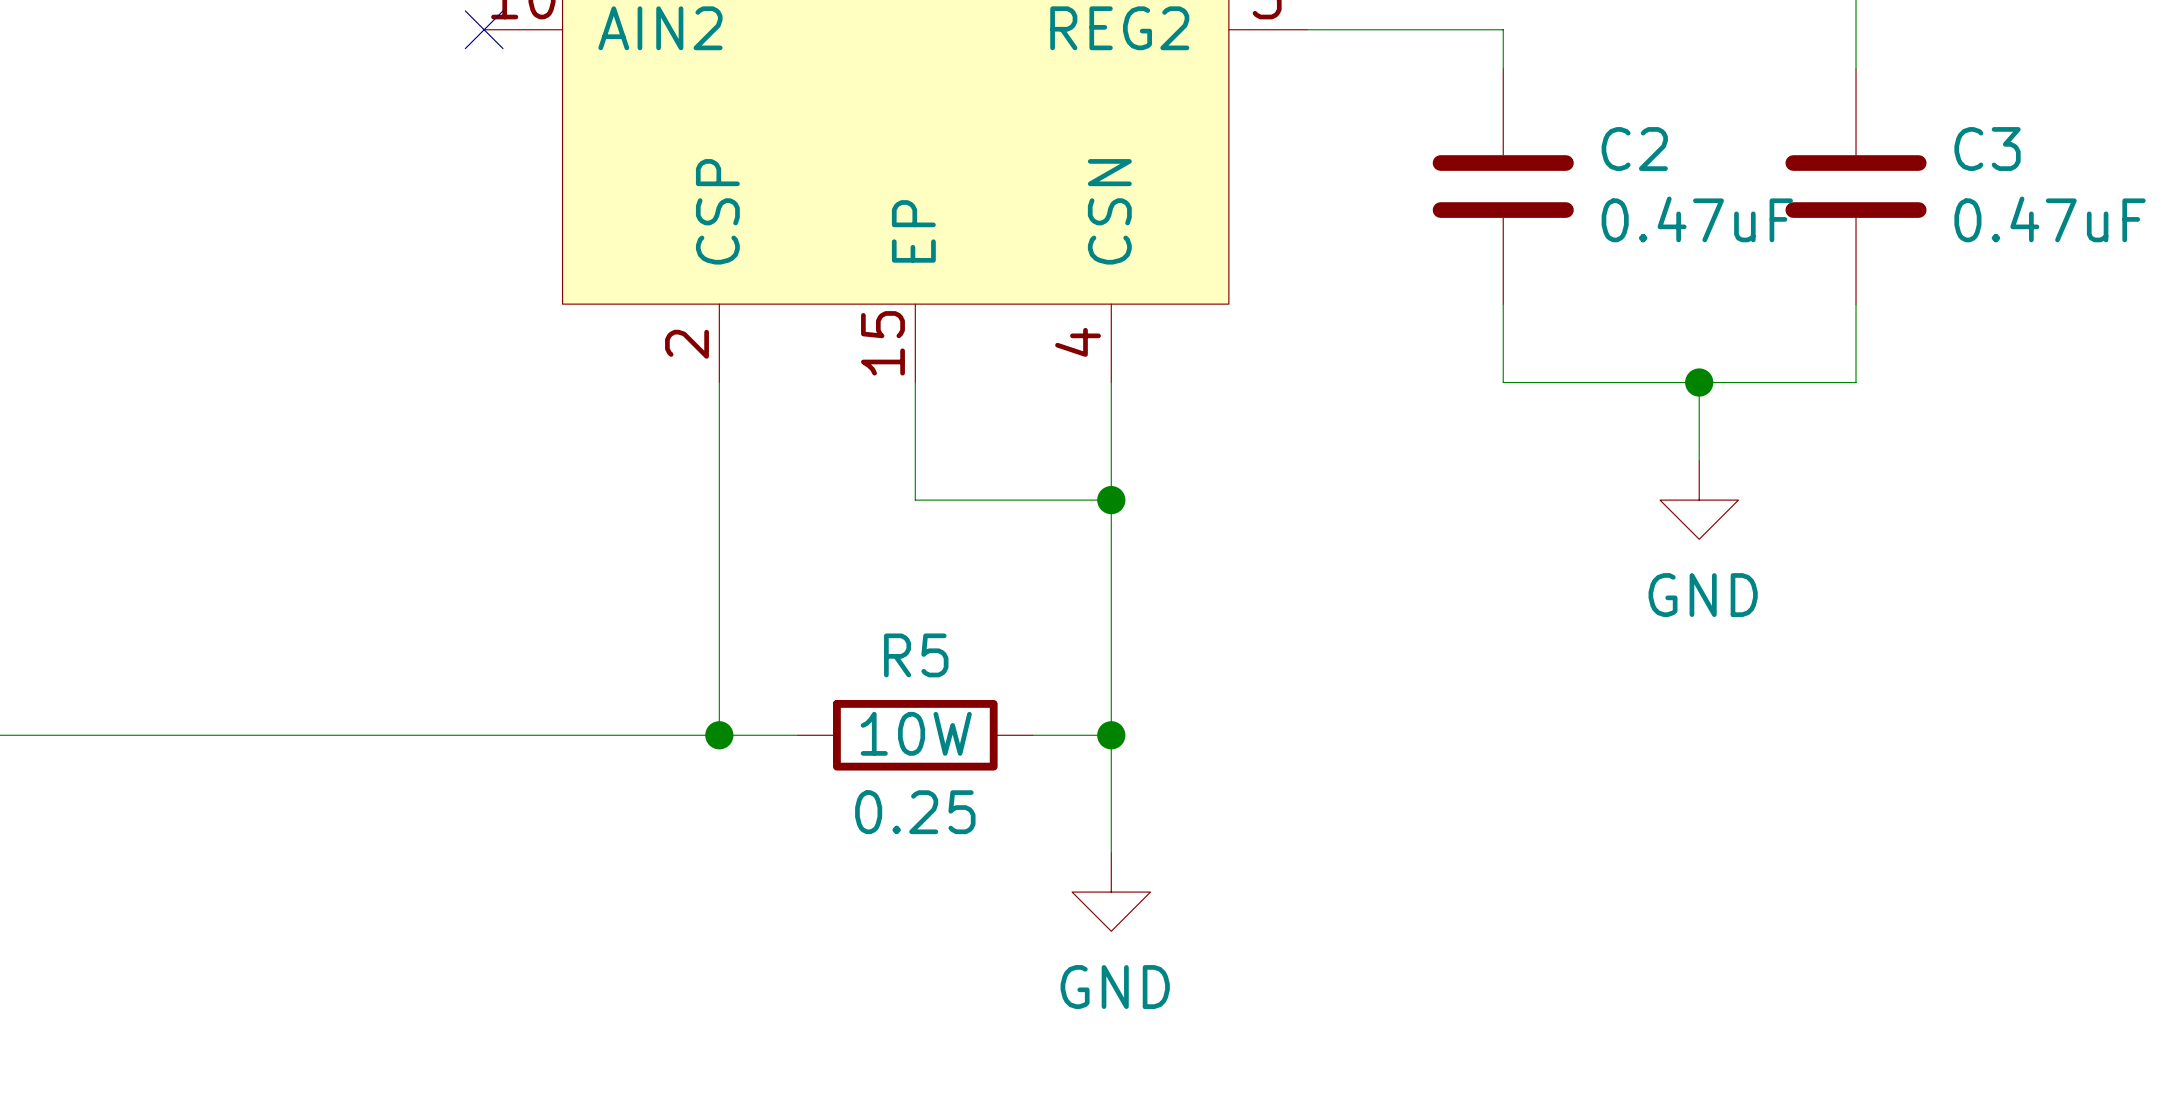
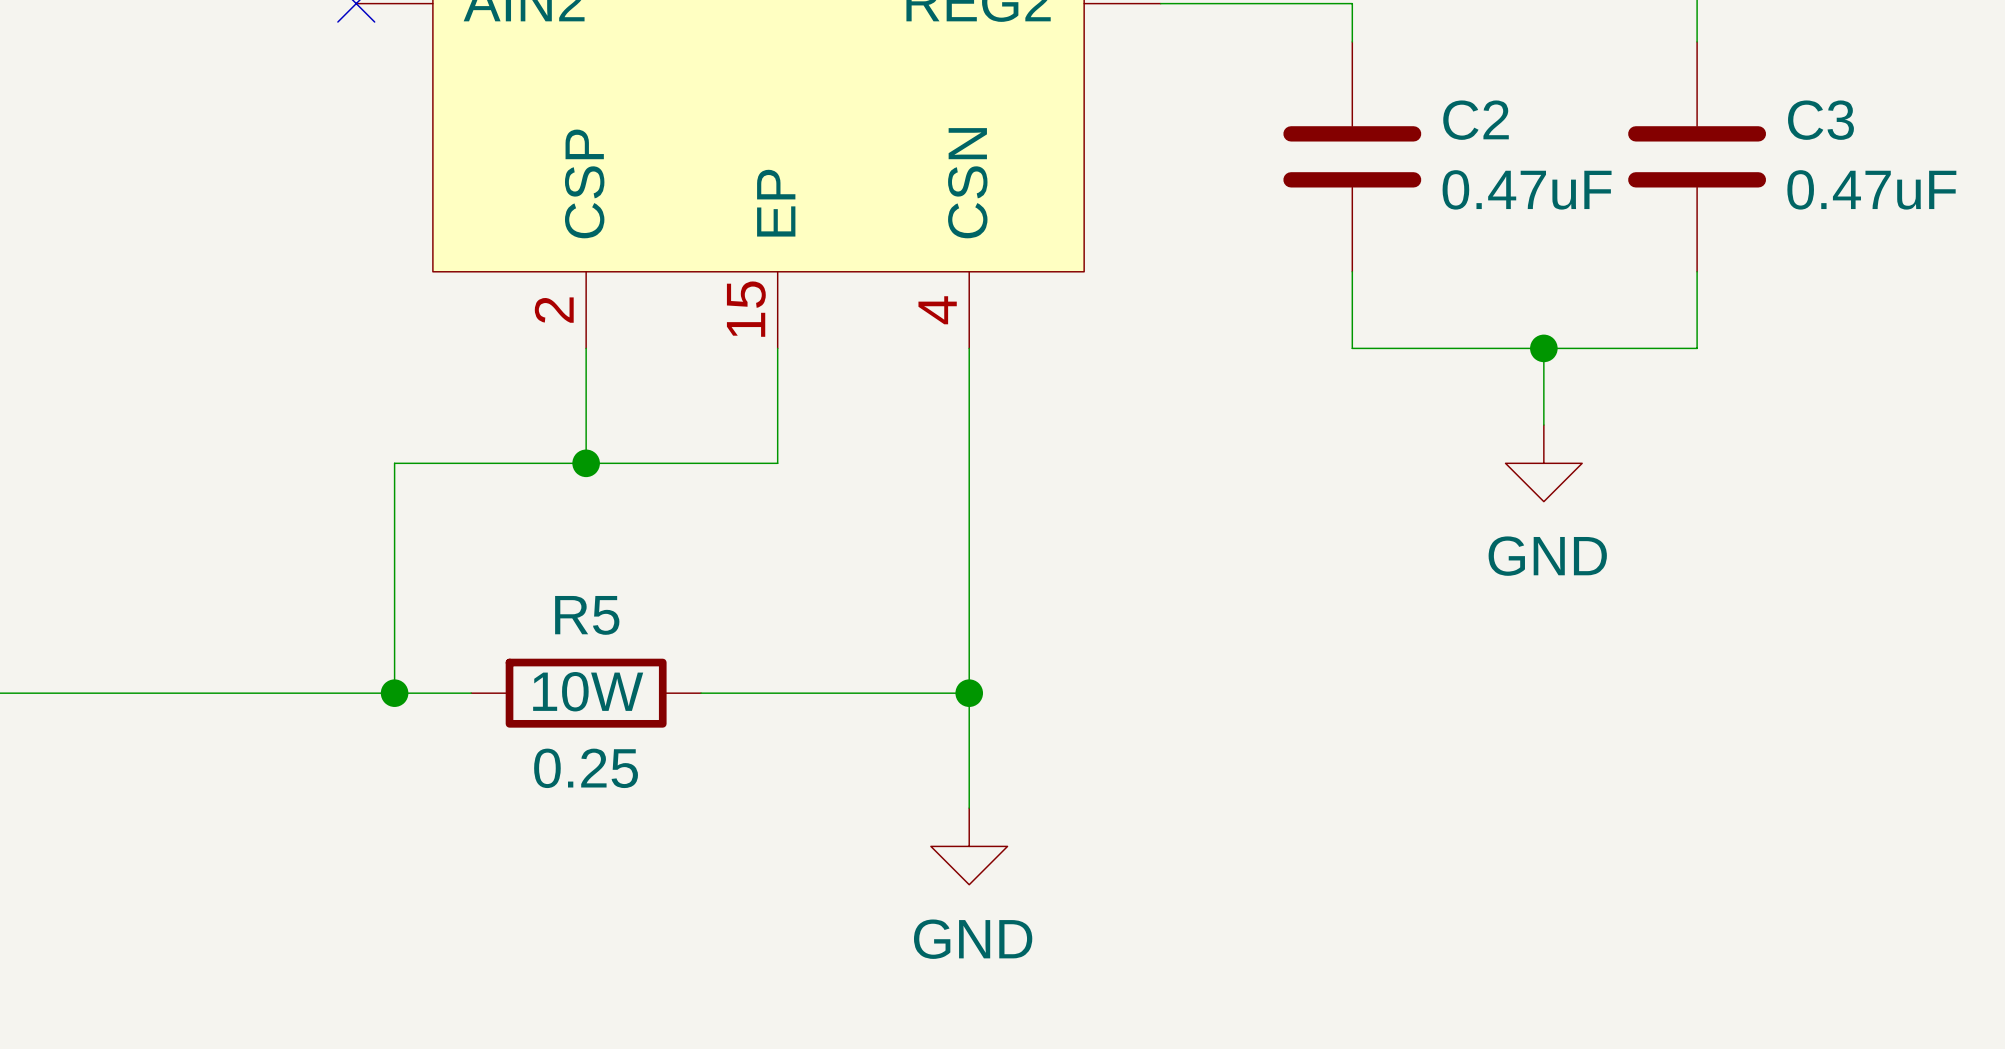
wire: (719, 500) (719, 735) -> none
junction: none -> (586, 463)
wire: (915, 500) (1111, 500) -> (777, 463) (394, 463) (394, 693)
junction: (1111, 500) -> none
junction: none -> (394, 693)
wire: (601, 735) (797, 735) -> (701, 693) (892, 693)
junction: (719, 735) -> none
R5 position: (915, 735) -> (586, 693)

